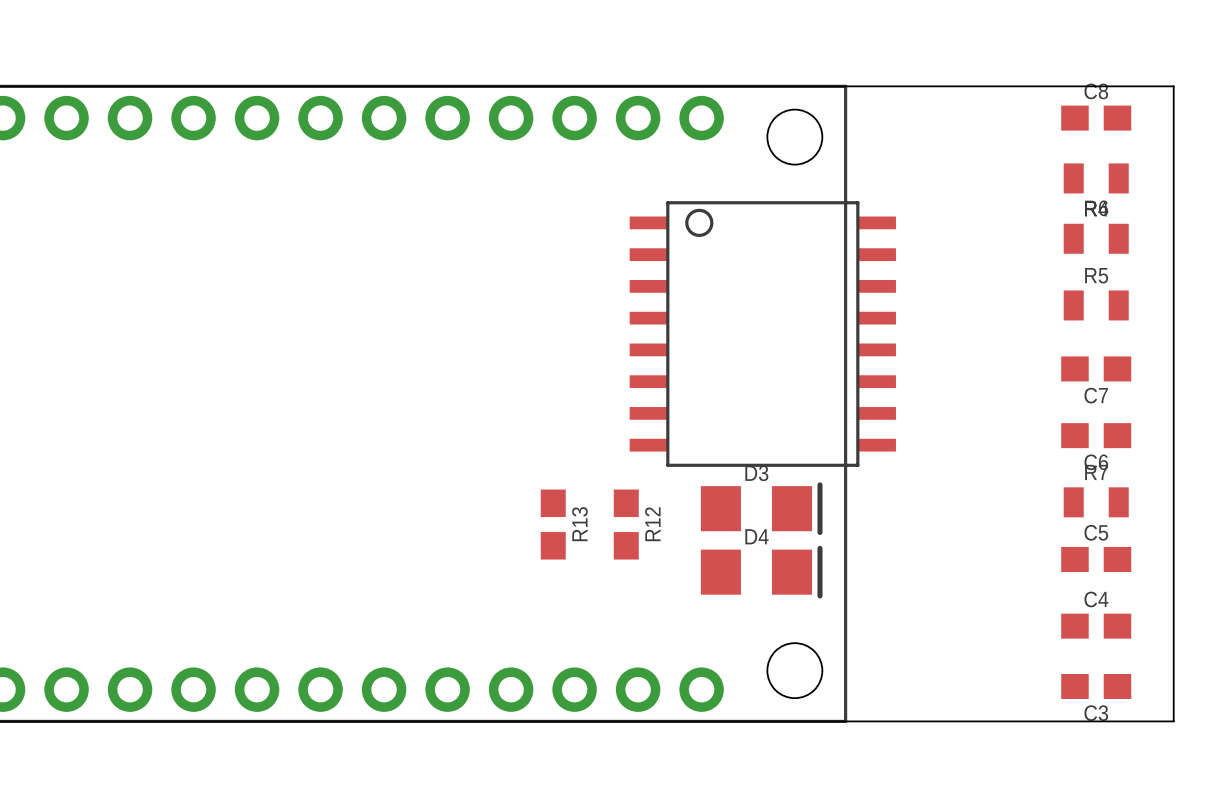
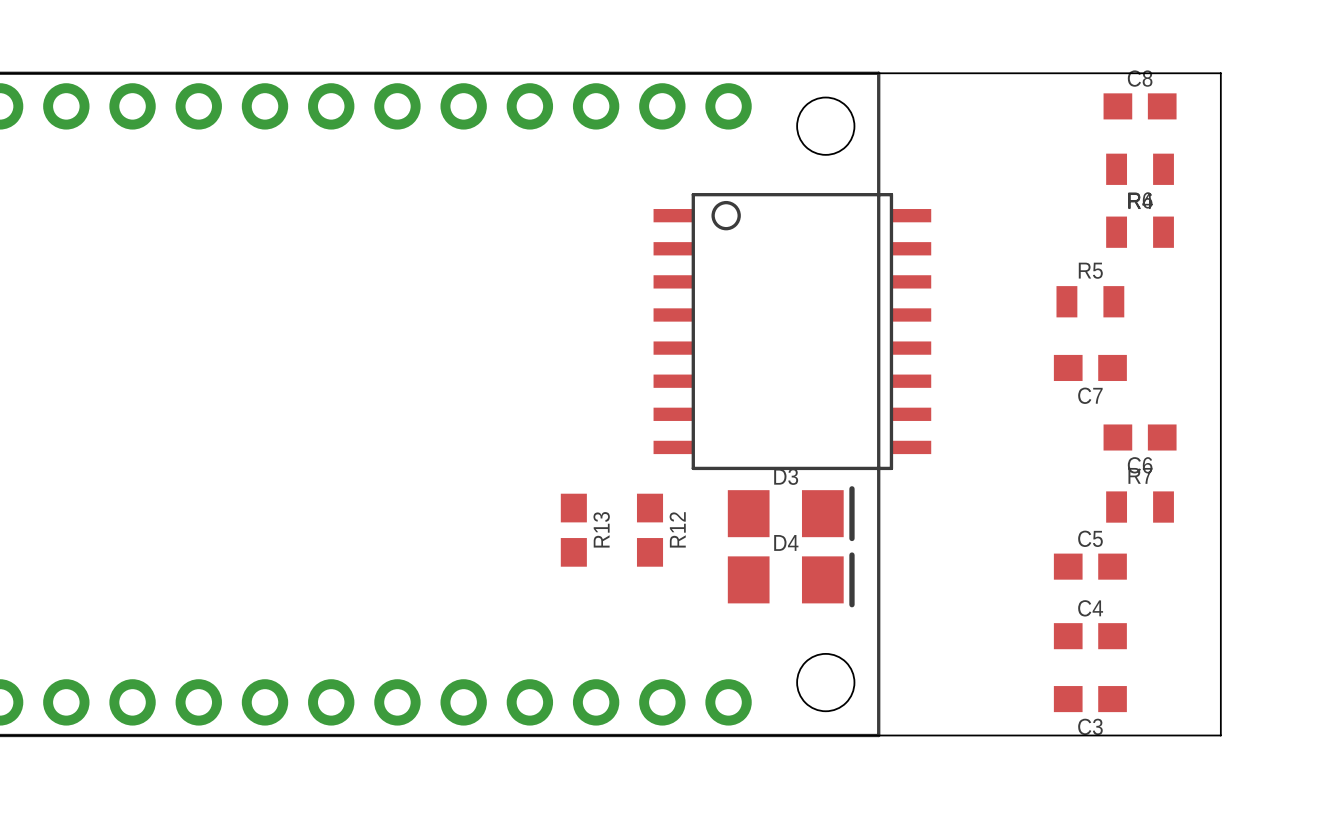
R5 position: (1096, 305) -> (1090, 301)
C7 position: (1096, 368) -> (1090, 367)
C5 position: (1096, 559) -> (1090, 566)
C4 position: (1096, 626) -> (1090, 636)
C3 position: (1096, 686) -> (1090, 699)

